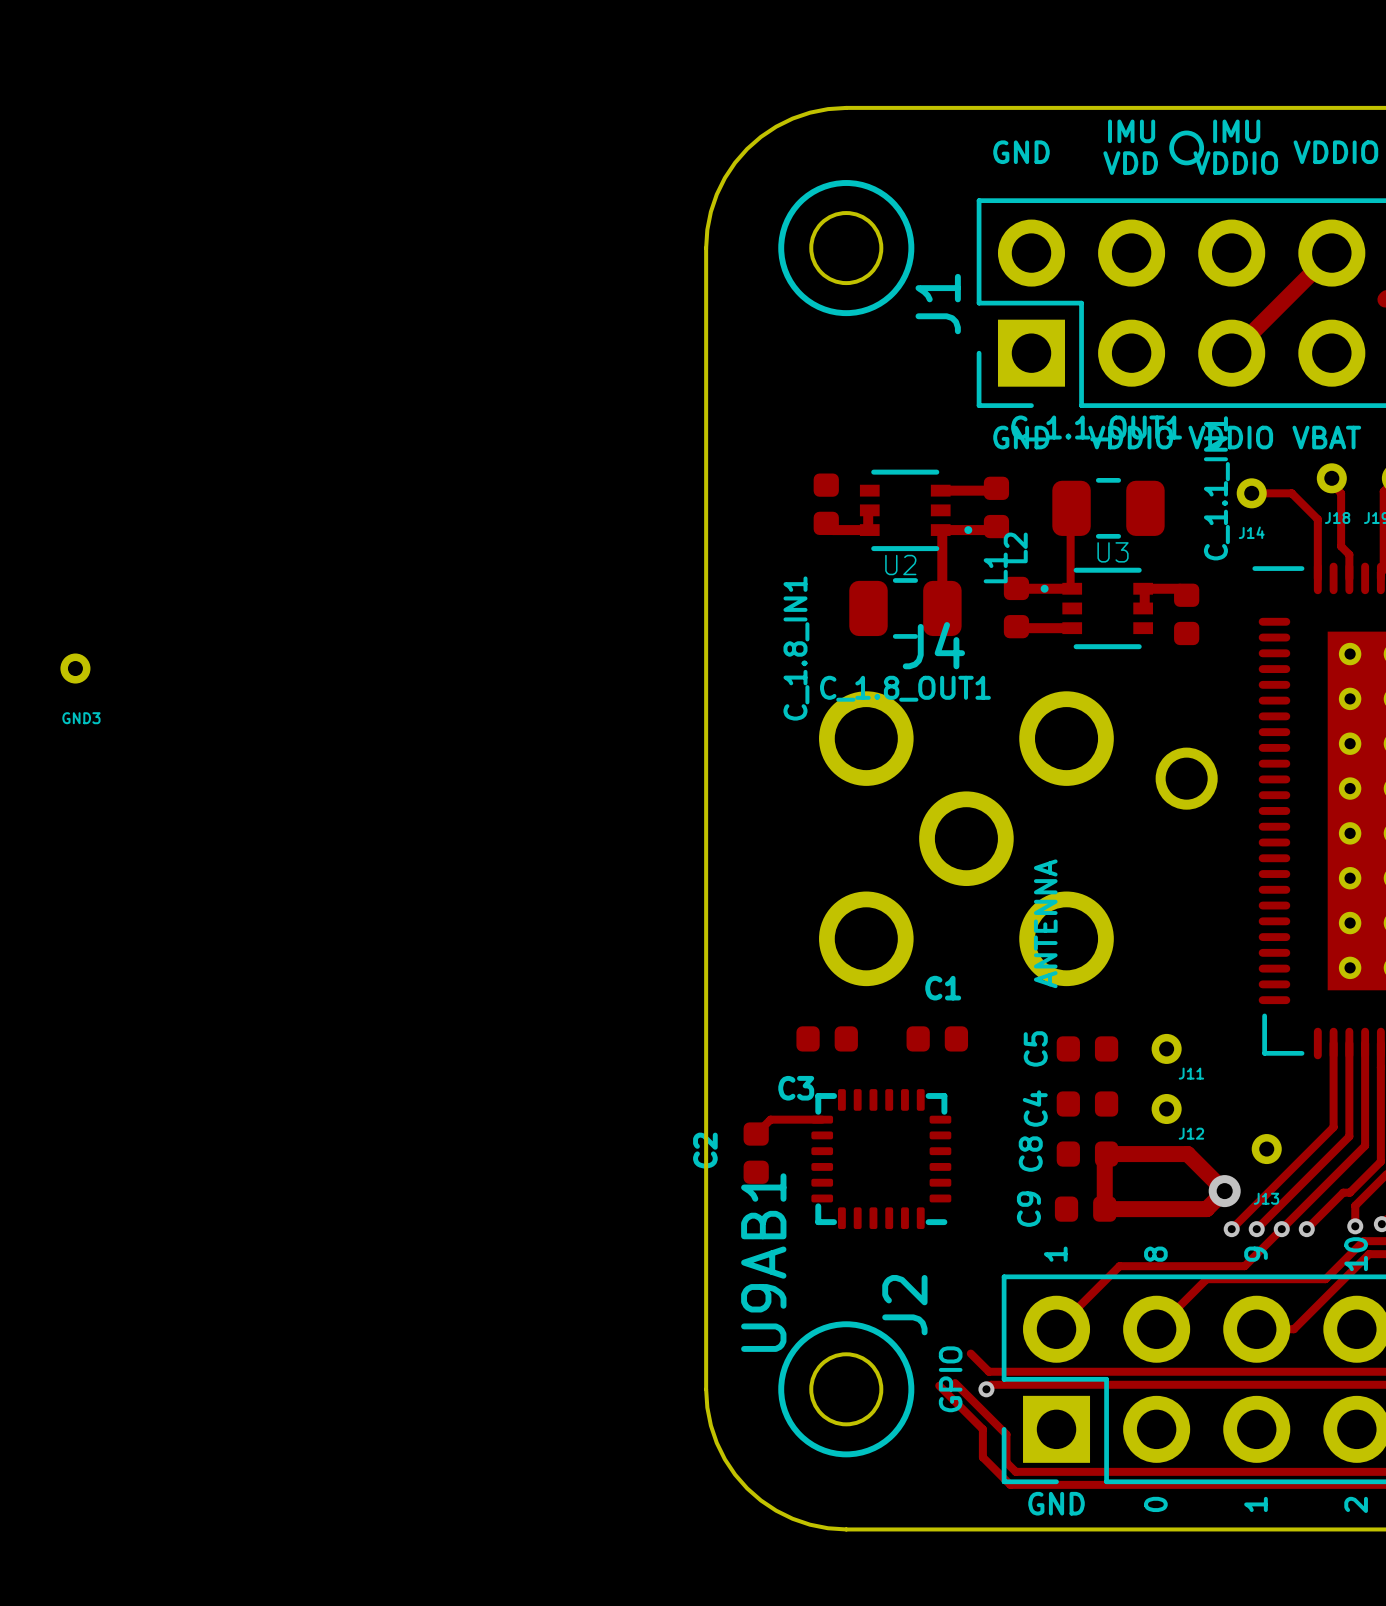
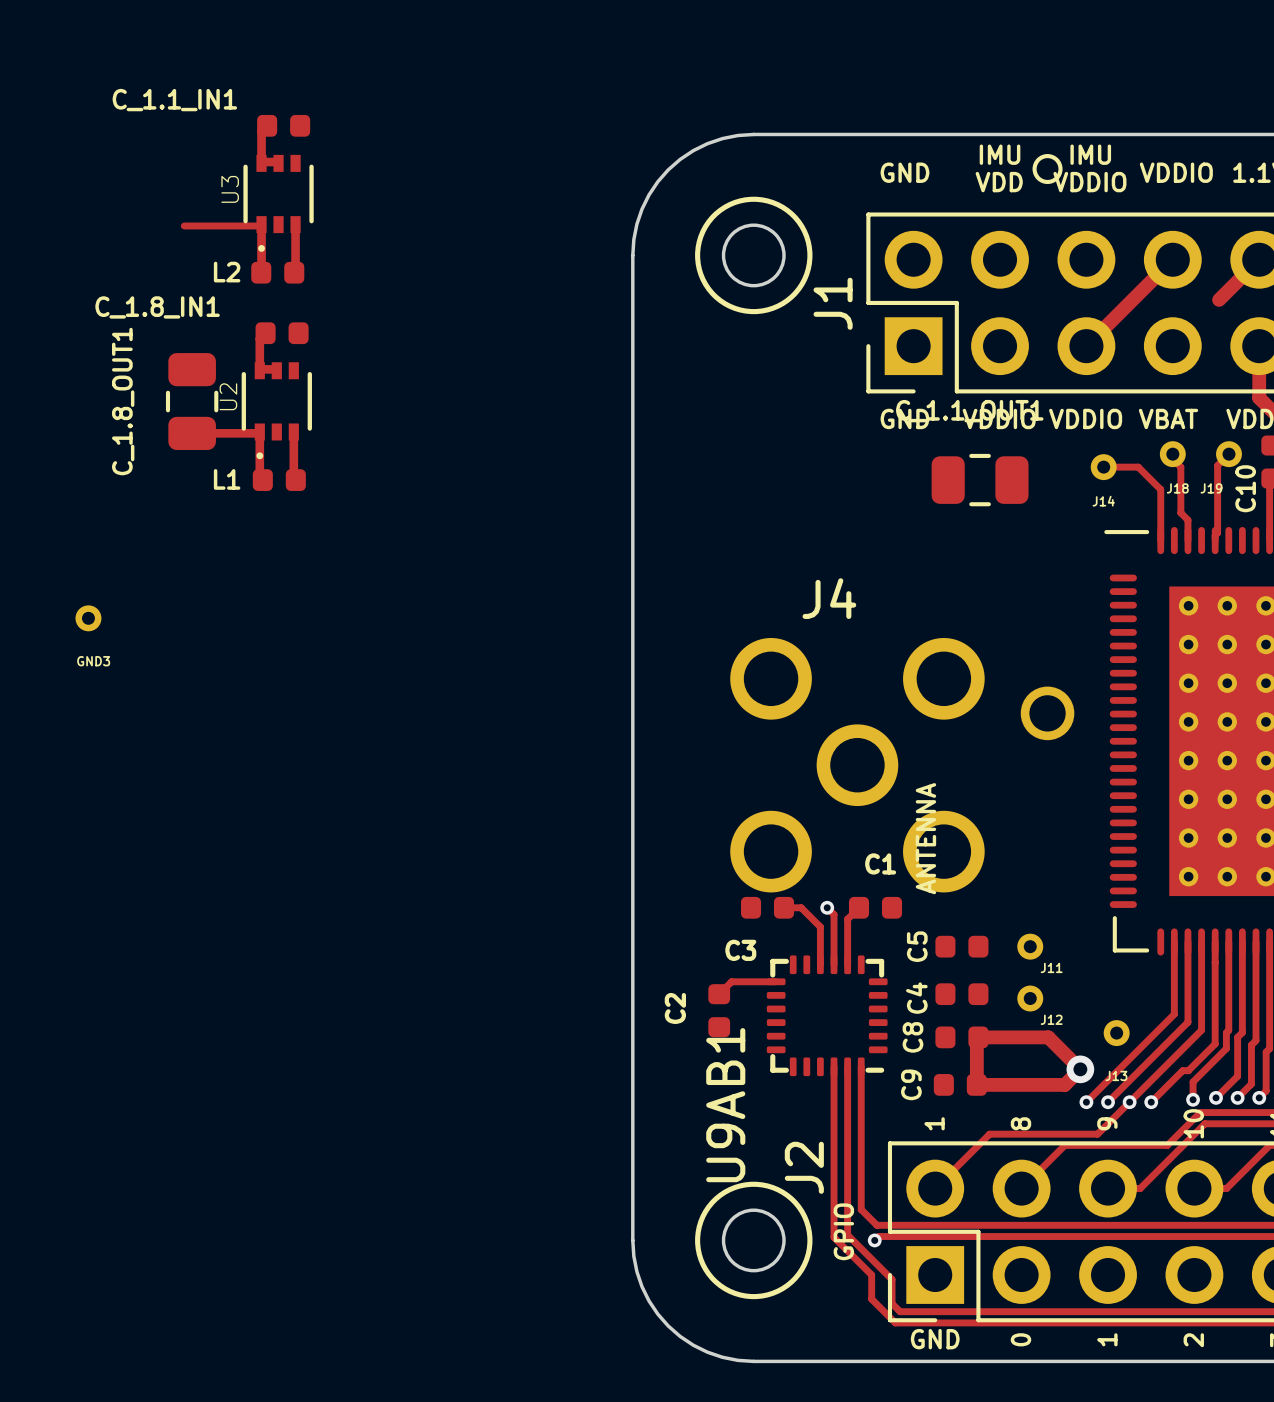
track: none -> (267, 125) (261, 131) (261, 162) (278, 162)
track: none -> (261, 224) (261, 265)
track: none -> (184, 225) (261, 225)
track: none -> (295, 225) (295, 264)
track: none -> (265, 333) (259, 338) (259, 369) (276, 369)
track: none -> (259, 431) (259, 477)
track: none -> (293, 431) (293, 478)
track: none -> (183, 433) (259, 433)
C_1.1_IN1 name position: C_1.1_IN1 (1216, 488) -> C_1.1_IN1 (174, 100)
track: (940, 490) (994, 490) -> none
track: (1070, 499) (1070, 588) -> none
C_1.8_IN1 rotation: 0° (826, 504) -> 90° clockwise (282, 333)
C_1.8_IN1 position: (826, 504) -> (282, 333)
L1 rotation: 0° (996, 507) -> 90° clockwise (279, 480)
L1 position: (996, 507) -> (279, 480)
track: (868, 510) (868, 530) (832, 530) (826, 523) -> none
U2 rotation: 0° (916, 510) -> 90° clockwise (276, 410)
U2 position: (916, 510) -> (276, 410)
track: (940, 530) (992, 530) -> none
track: (942, 530) (942, 618) -> none
L2 name position: L2 (1015, 547) -> L2 (227, 272)
track: (1024, 588) (1072, 588) -> none
track: (1180, 588) (1144, 588) (1144, 608) -> none
L2 rotation: 0° (1016, 607) -> 90° clockwise (277, 272)
L2 position: (1016, 607) -> (277, 272)
C_1.8_OUT1 rotation: 0° (905, 608) -> 90° clockwise (192, 401)
C_1.8_OUT1 position: (905, 608) -> (192, 401)
U3 rotation: 0° (1096, 608) -> 90° counterclockwise (278, 203)
U3 position: (1096, 608) -> (278, 203)
C_1.1_IN1 rotation: 0° (1186, 614) -> 90° clockwise (283, 125)
C_1.1_IN1 position: (1186, 614) -> (283, 125)
track: (1026, 628) (1070, 628) -> none
track: none -> (784, 907) (801, 907) (820, 927) (820, 964)
track: none -> (827, 907) (834, 914) (834, 964)
via: none -> (827, 907)
track: none -> (859, 907) (847, 919) (847, 964)
C3 position: (827, 1038) -> (767, 907)
C1 position: (937, 1038) -> (875, 907)
track: (822, 1119) (770, 1119) (756, 1134) -> (776, 981) (731, 981) (719, 994)
C2 position: (756, 1153) -> (719, 1010)
U9AB1 position: (881, 1159) -> (827, 1015)
track: none -> (834, 1066) (834, 1237)
track: none -> (847, 1066) (847, 1235)
track: none -> (861, 1066) (861, 1209)

